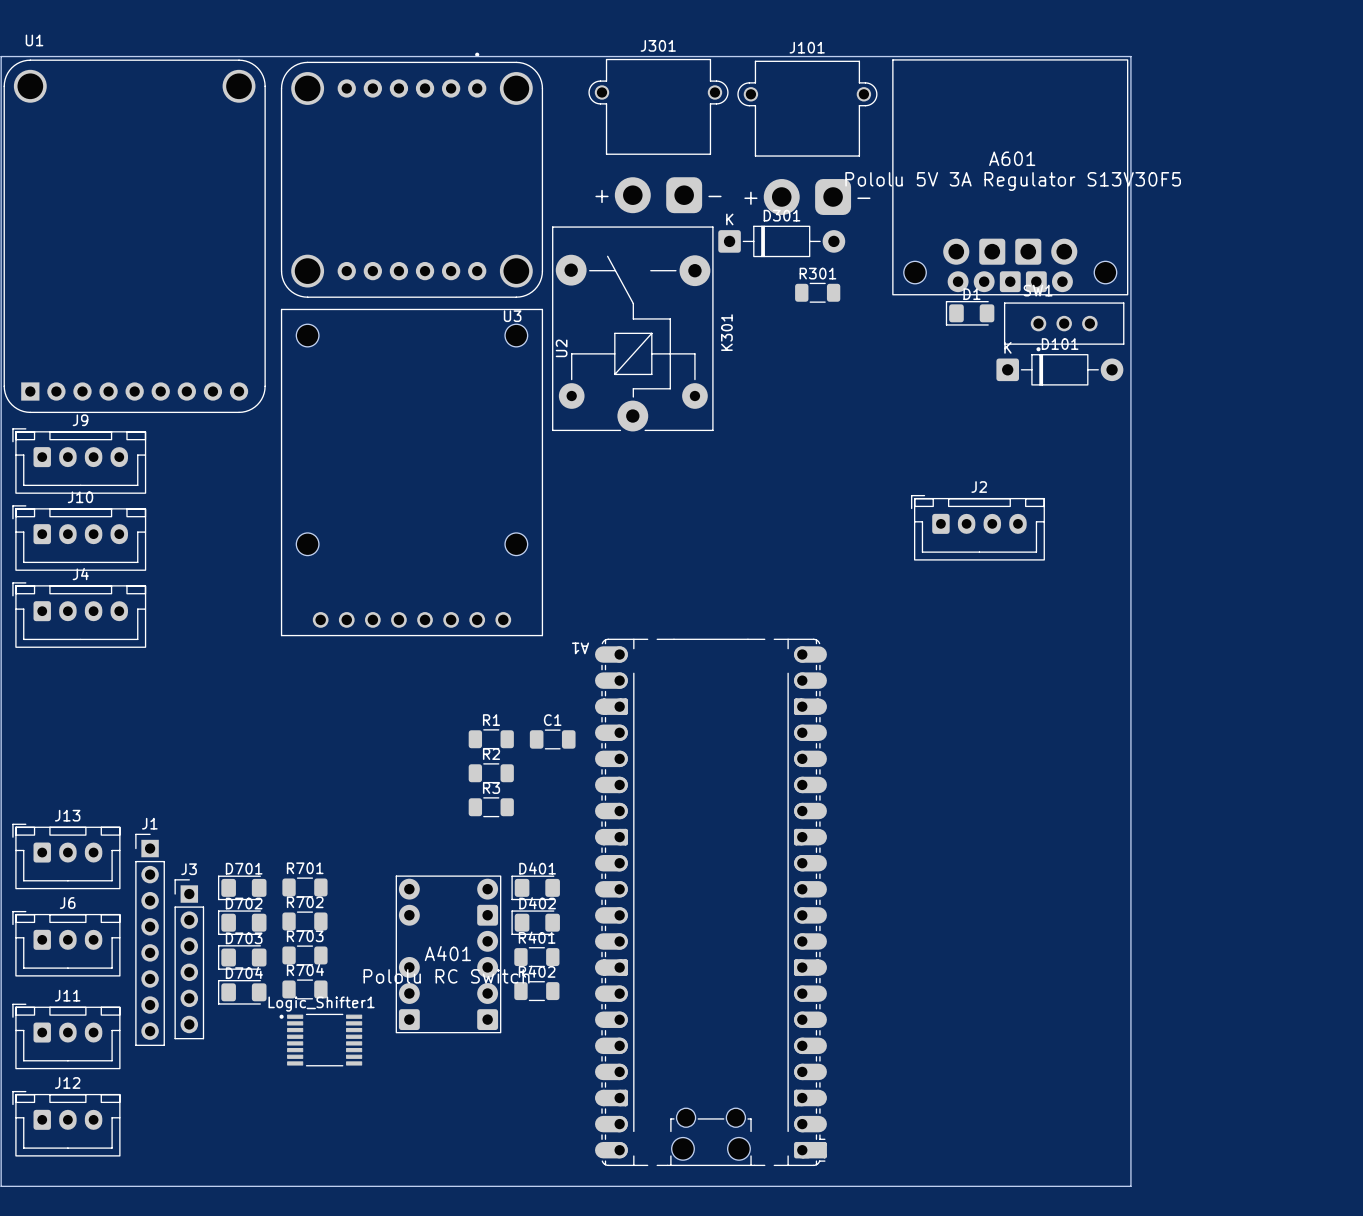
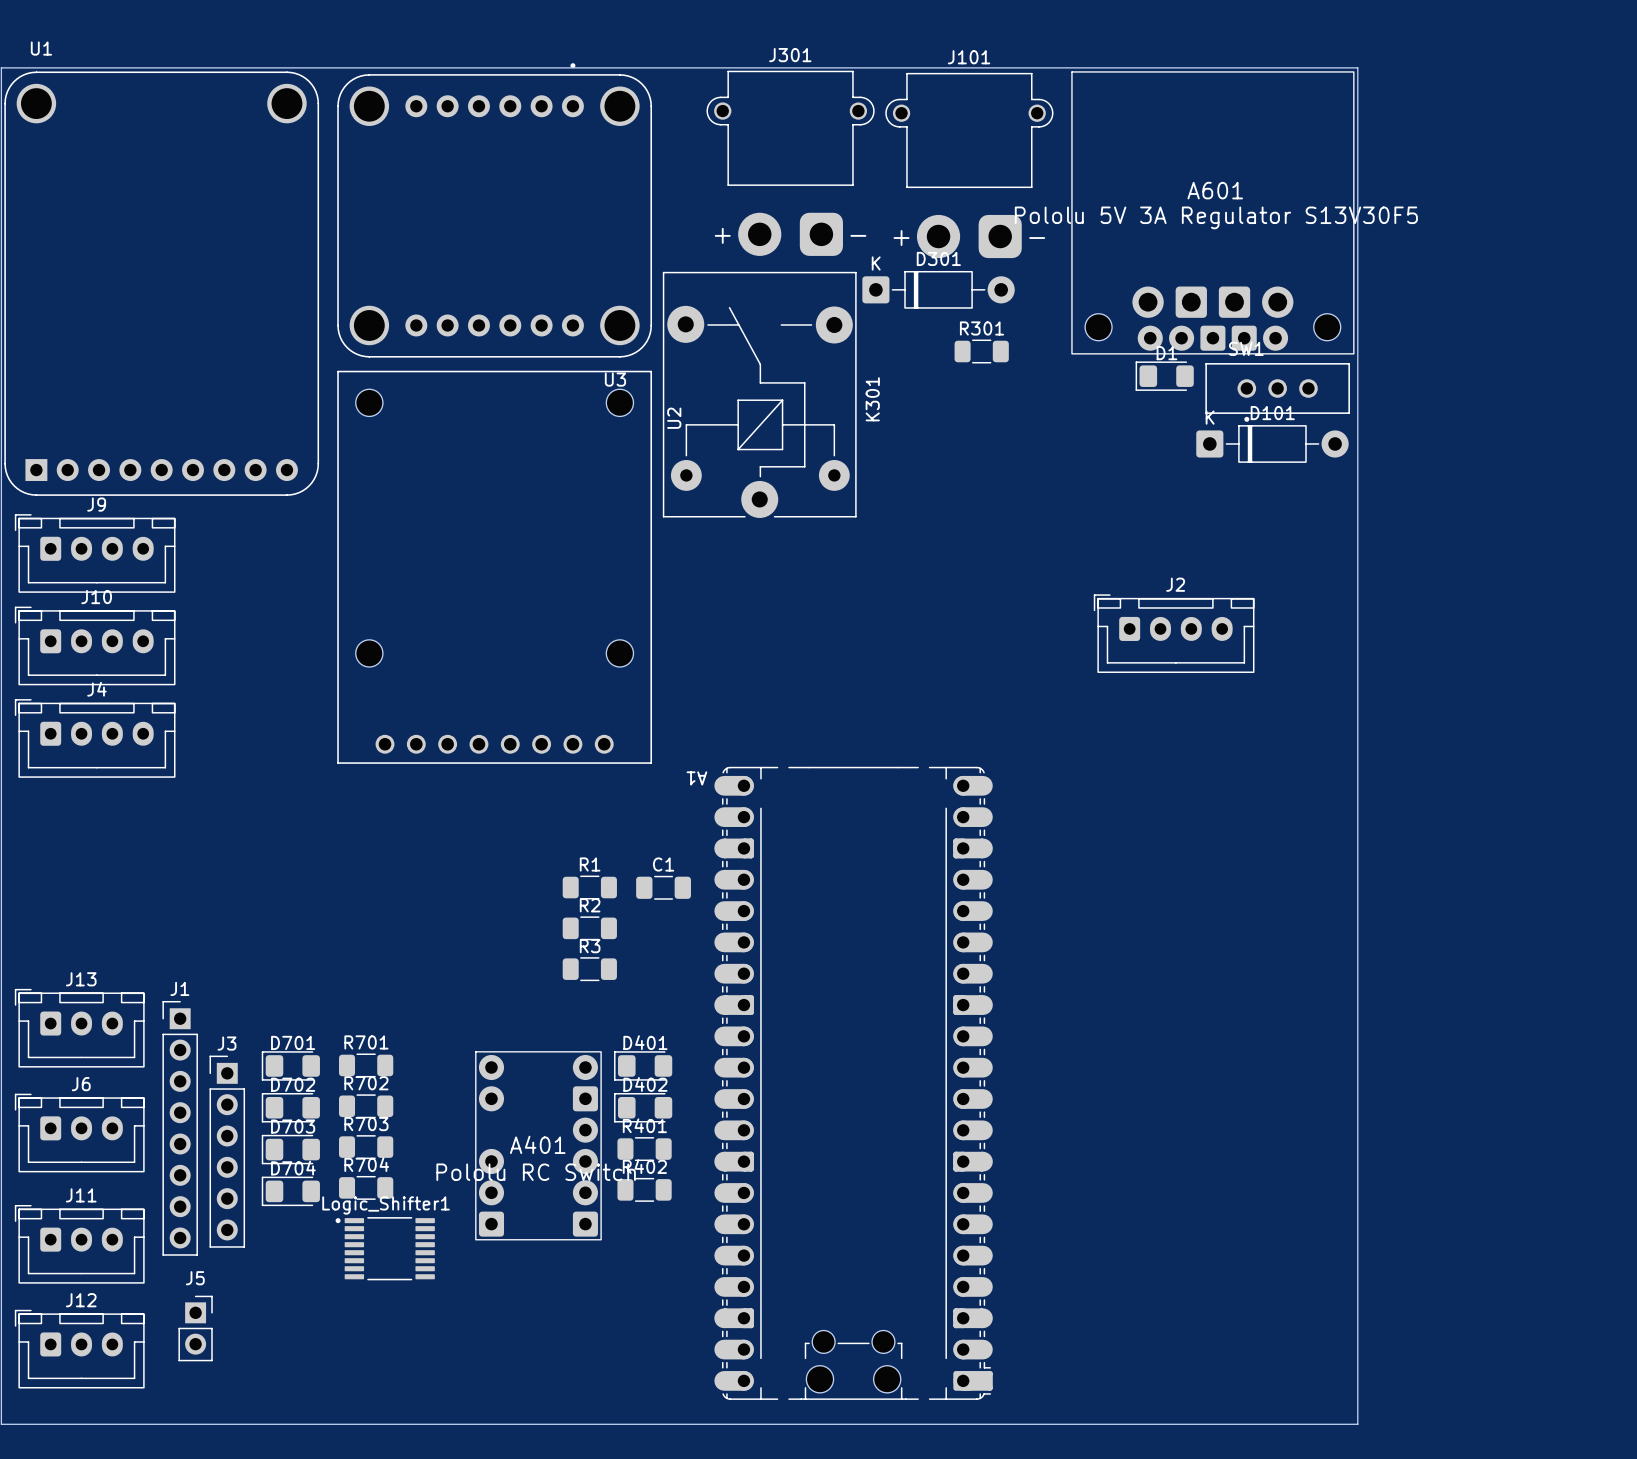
J5: none -> (195, 1328)

